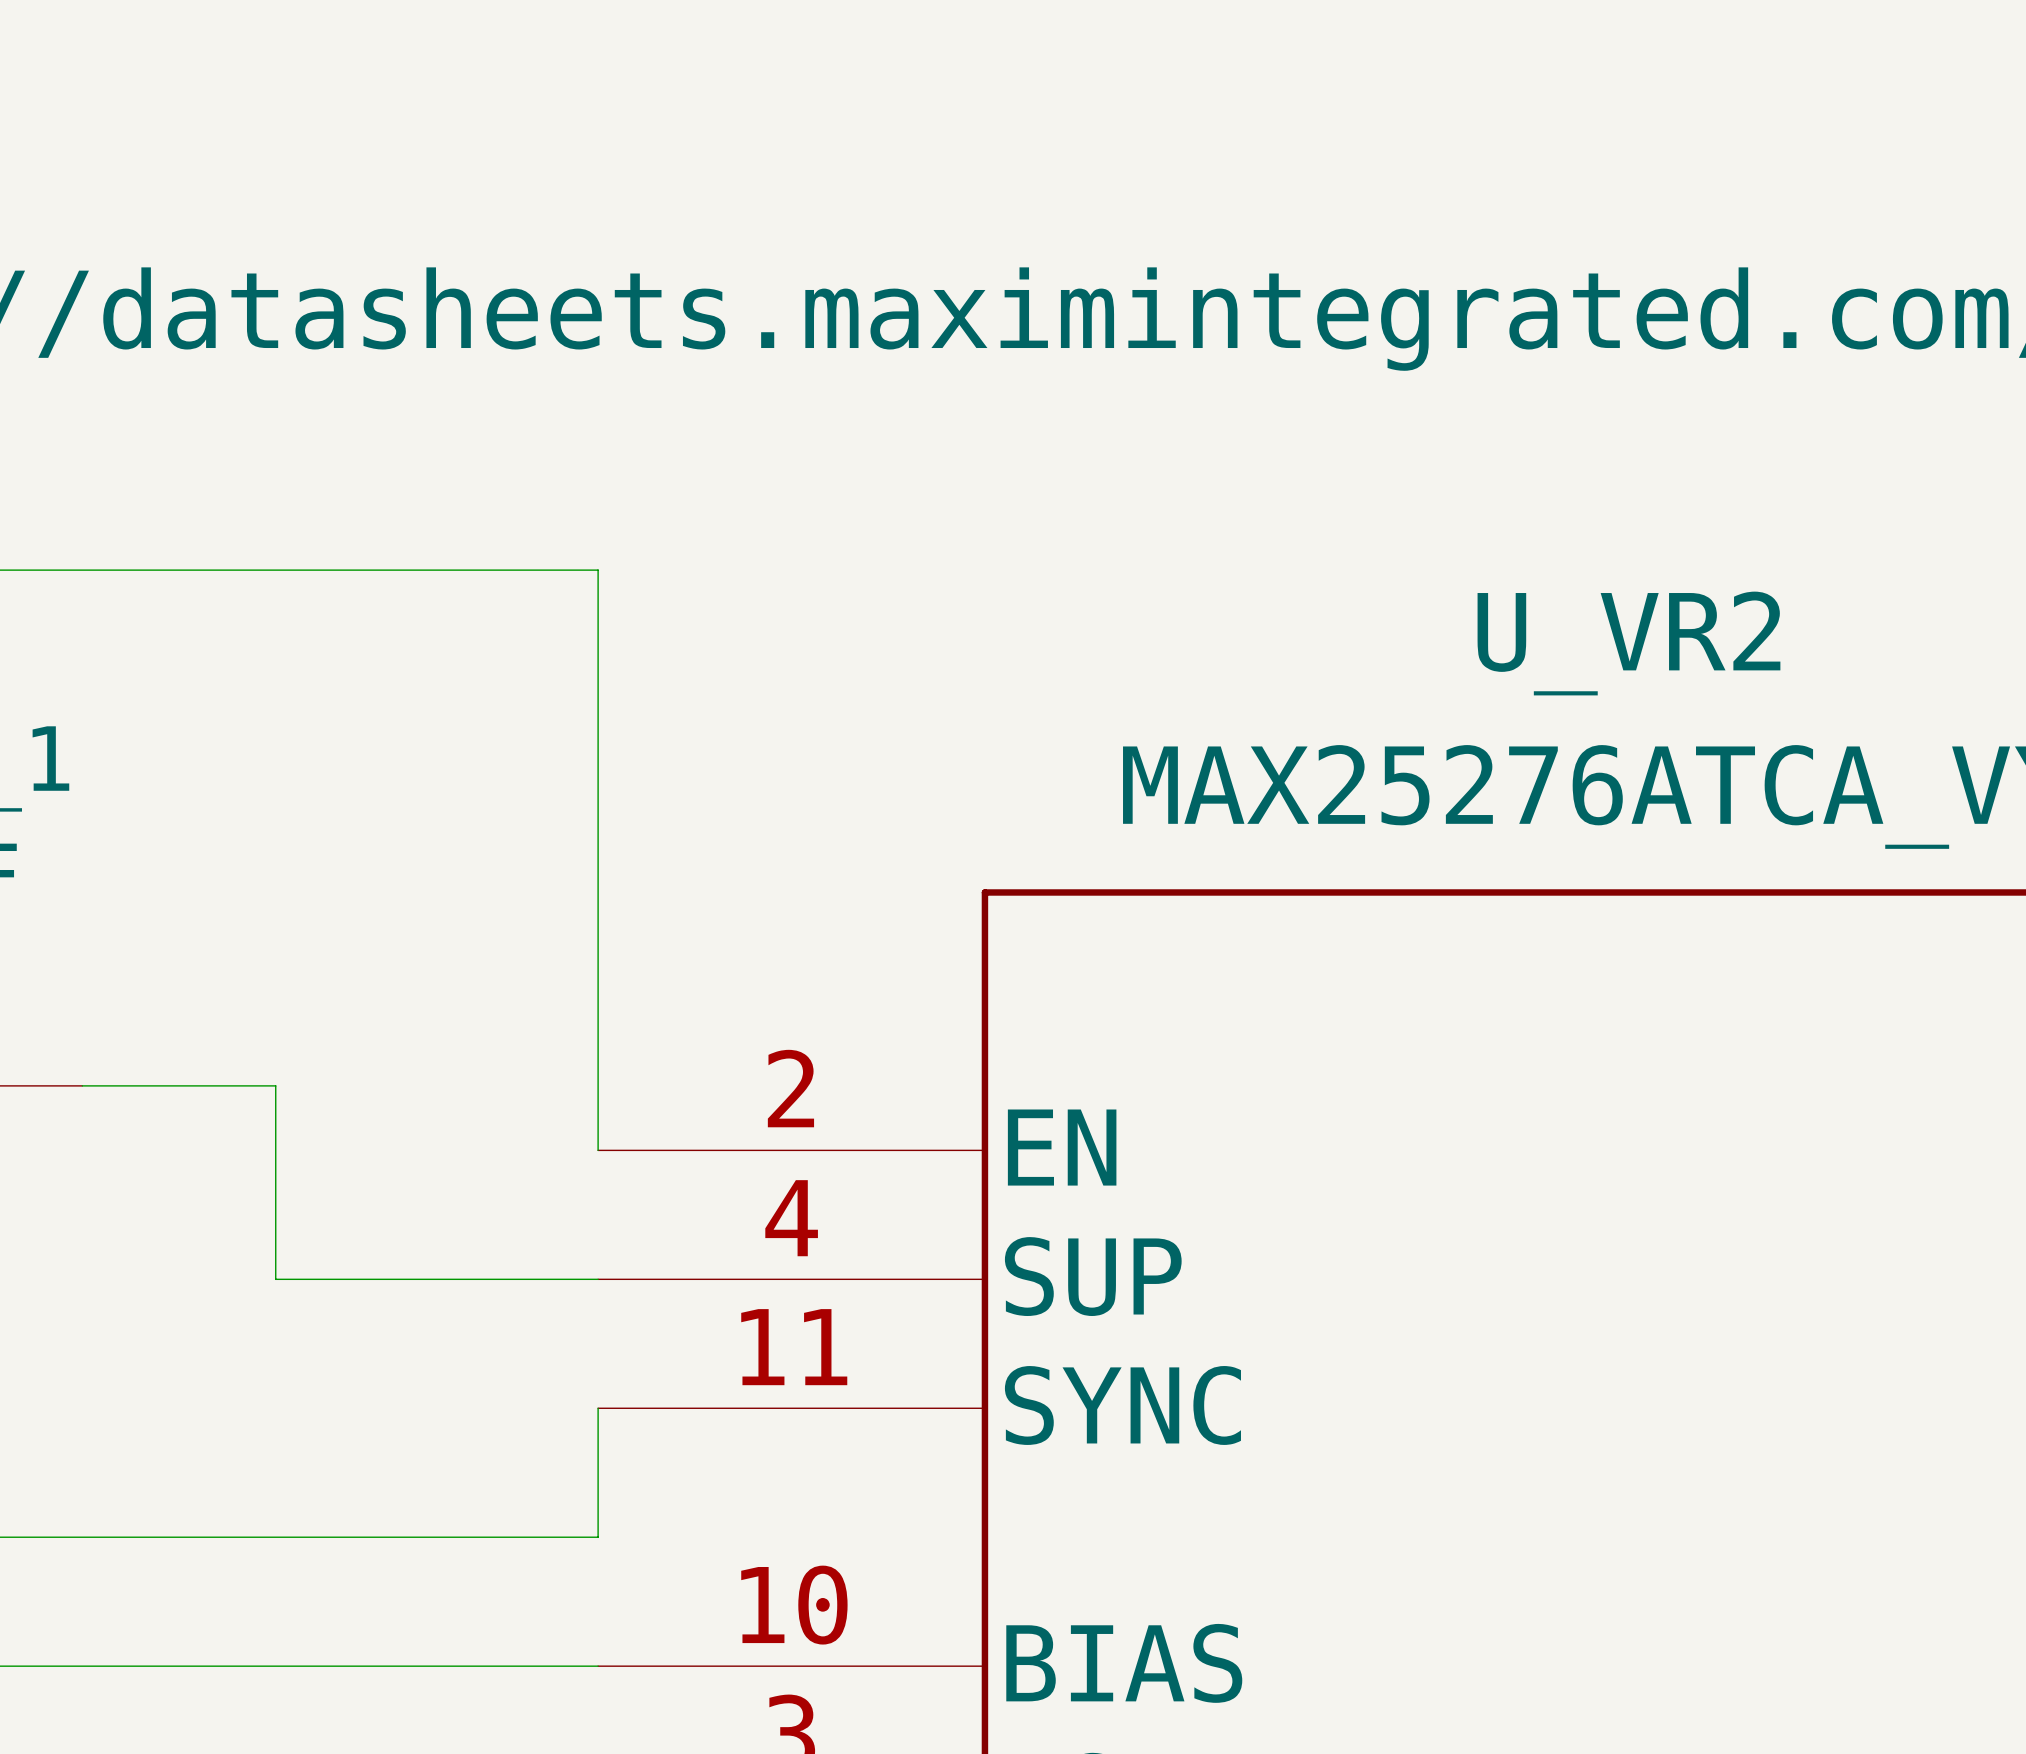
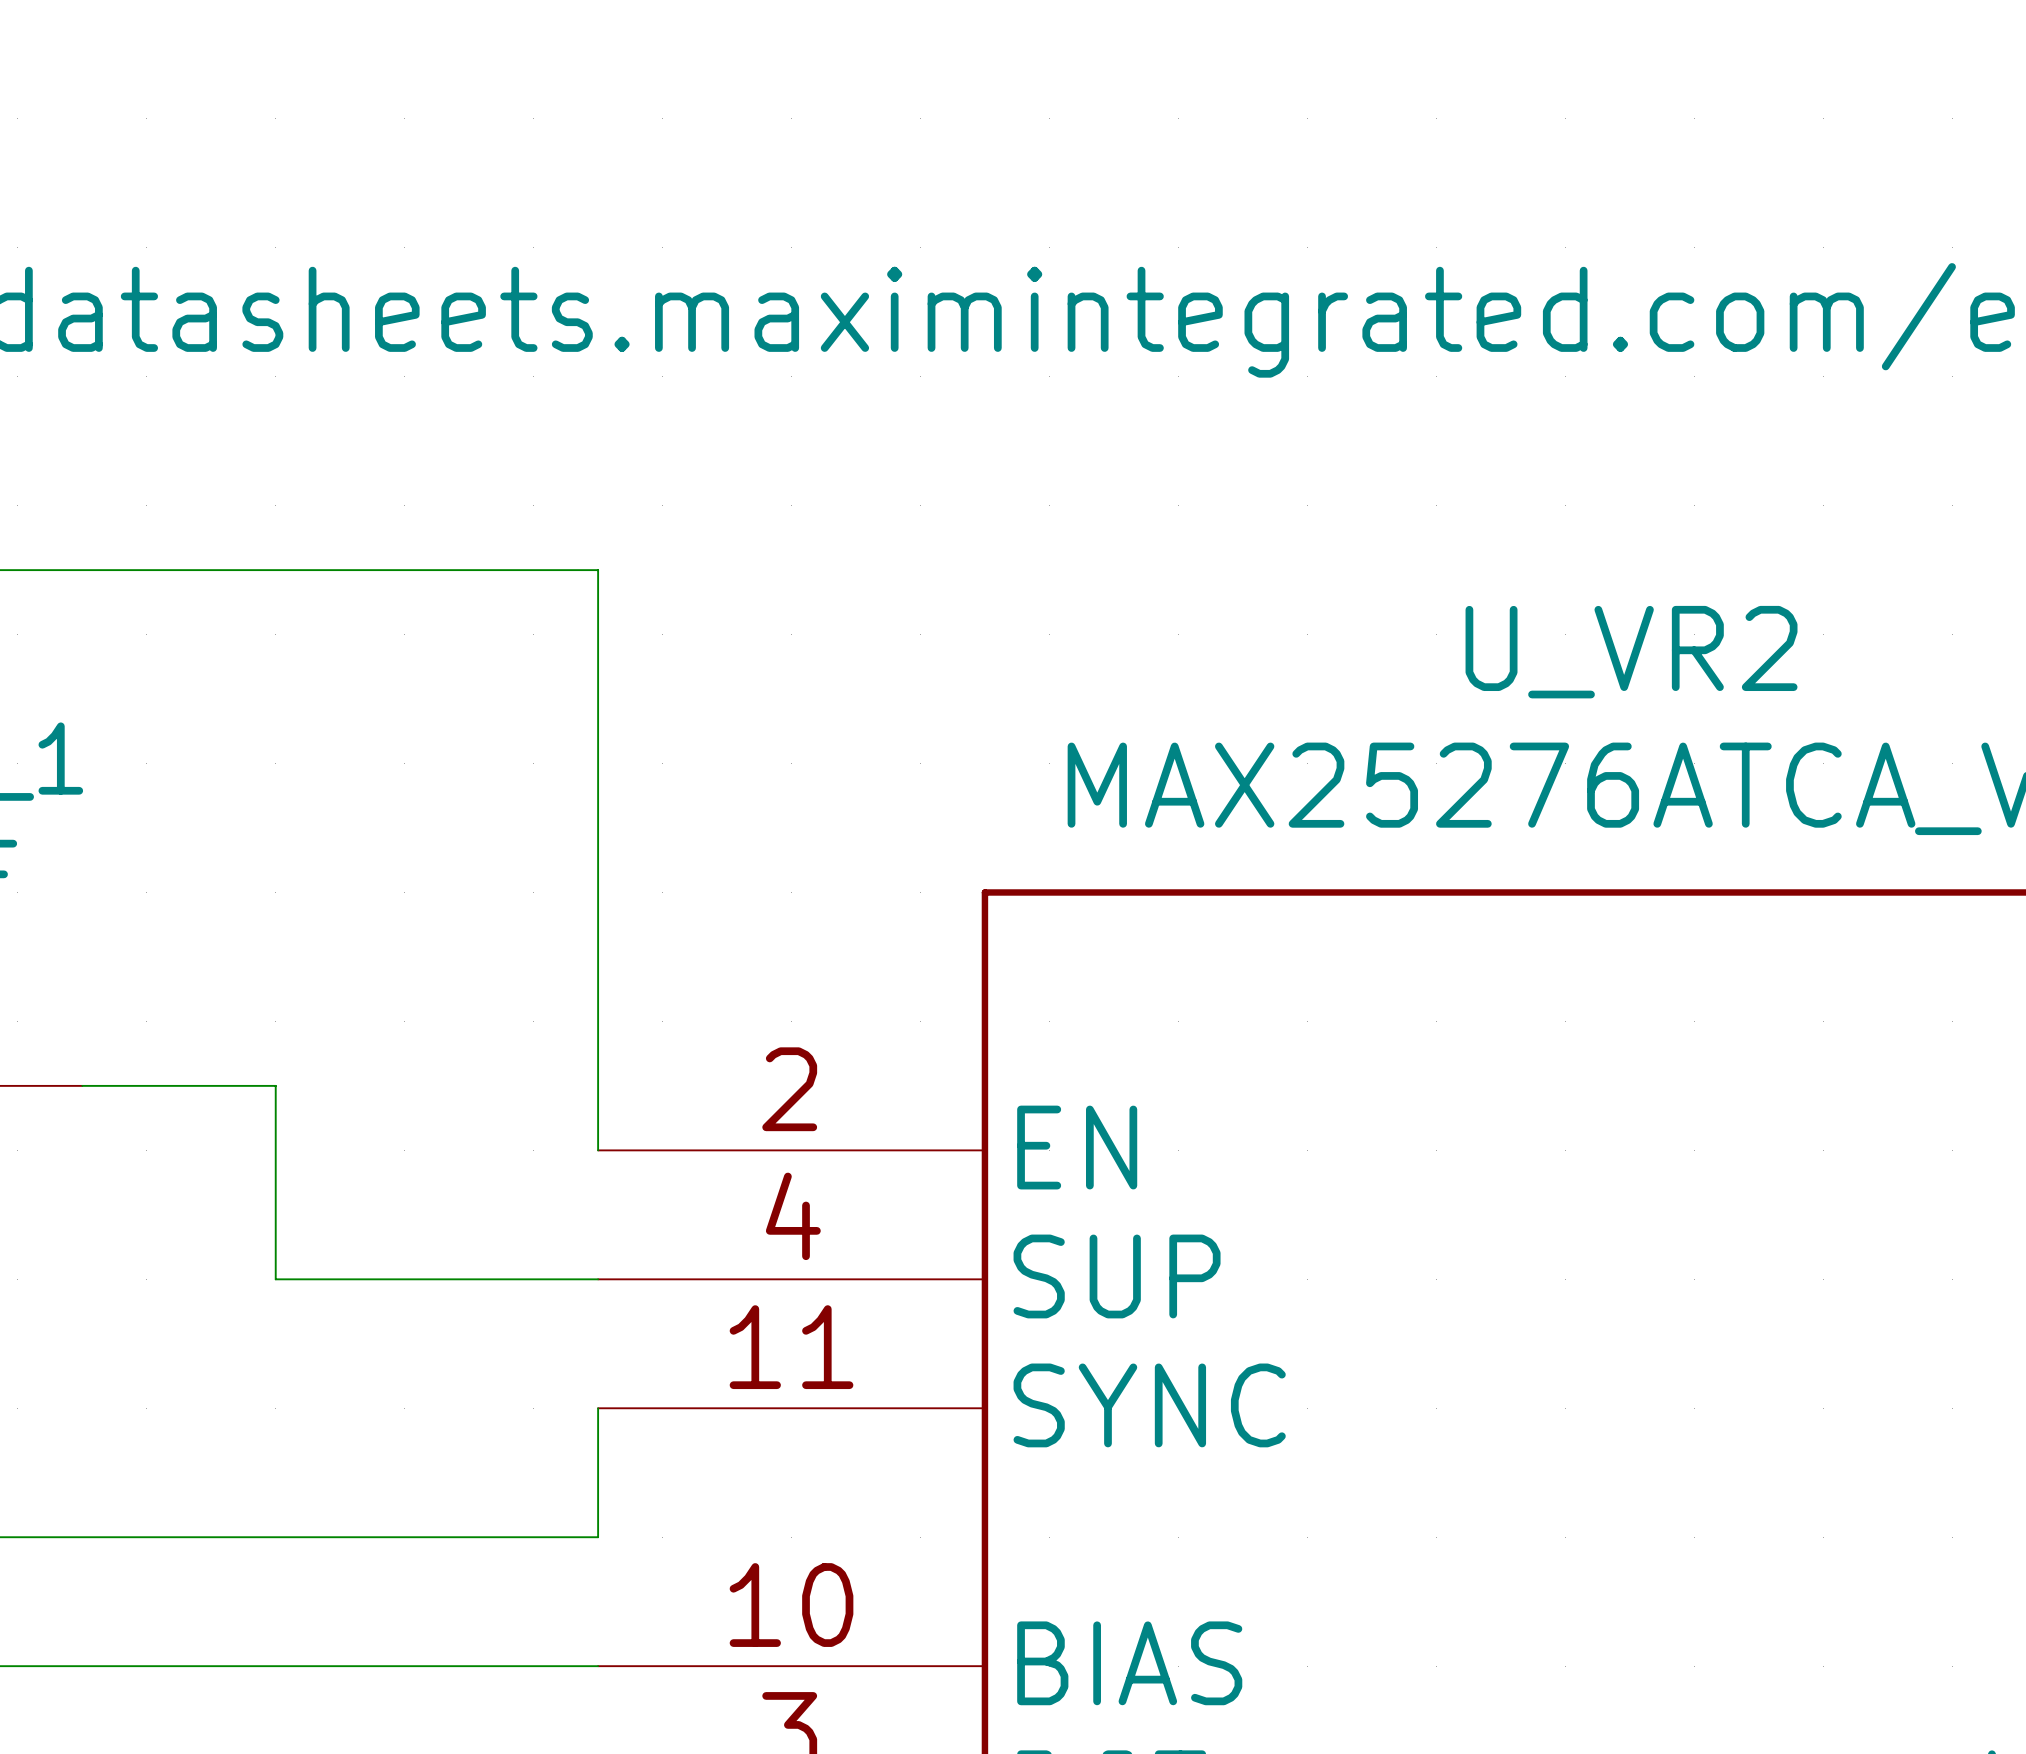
U_VR2 name position: U_VR2 (1628, 643) -> U_VR2 (1631, 652)

